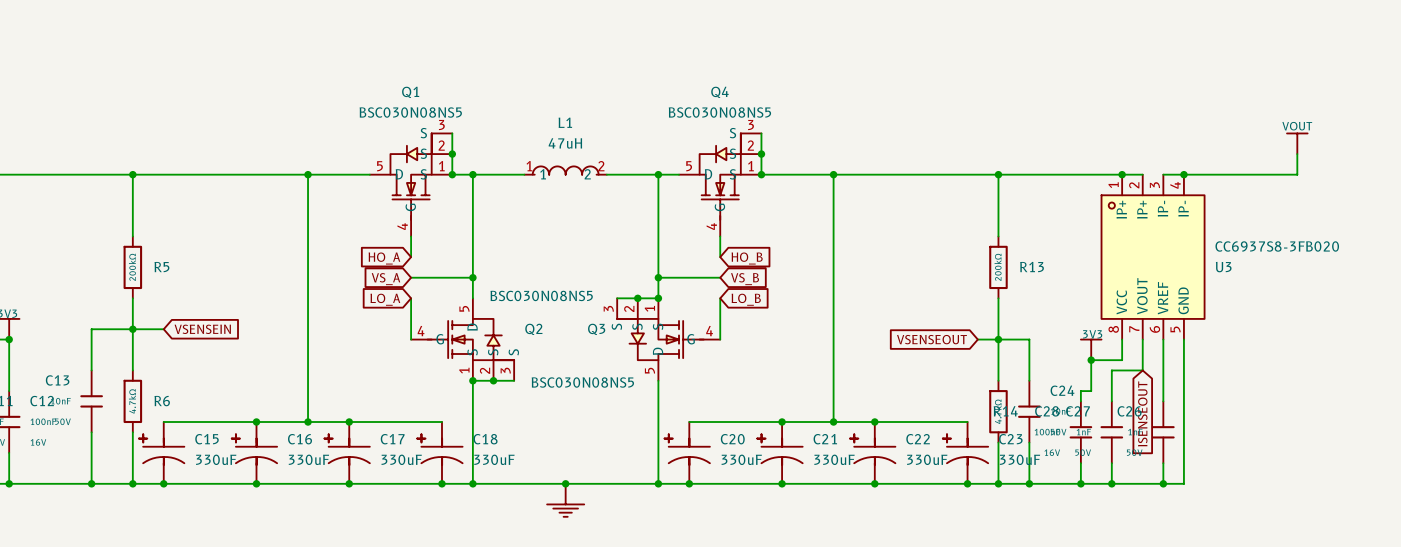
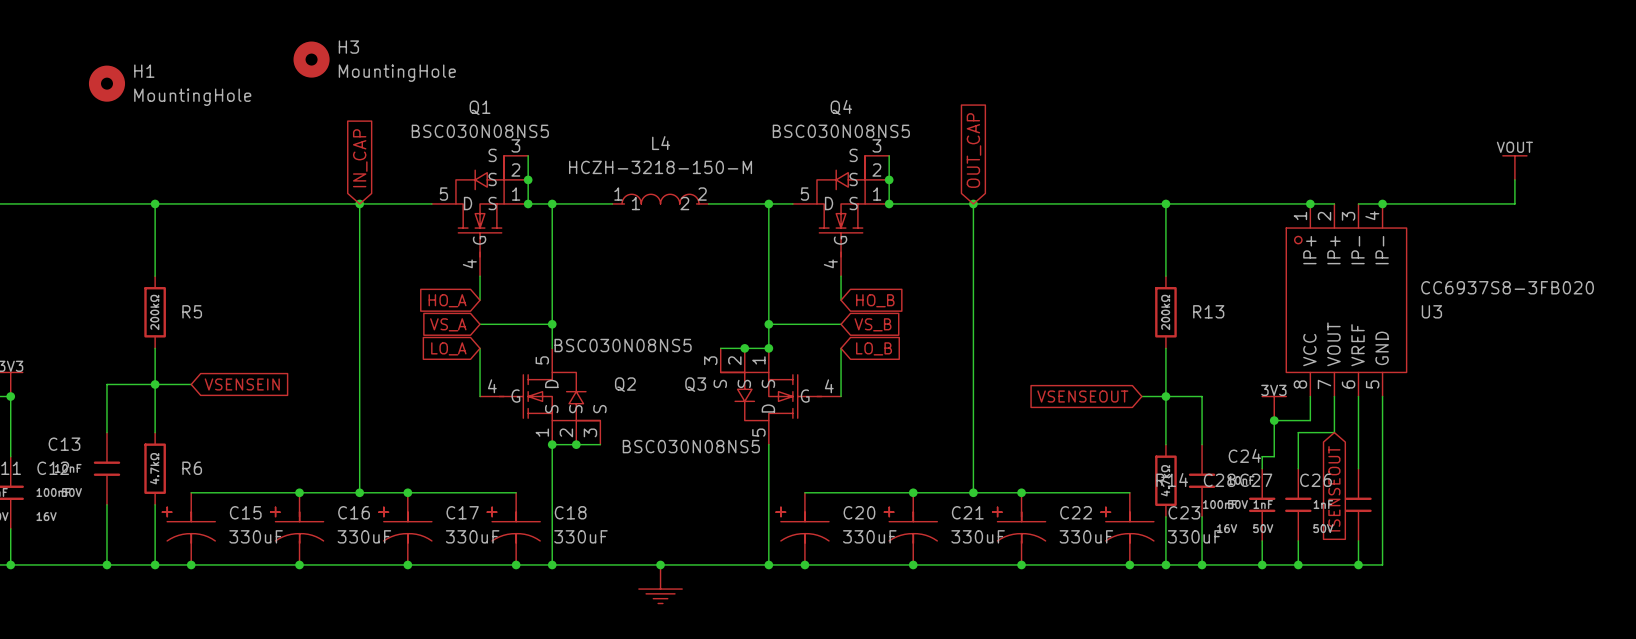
H3: none -> MountingHole (311, 59)
H1: none -> MountingHole (106, 83)
L1 name: L1 (565, 122) -> L4 (661, 143)
global label: none -> OUT_CAP (973, 150)
global label: none -> IN_CAP (360, 158)
L1 value: 47uH (565, 143) -> HCZH-3218-150-M (660, 167)

